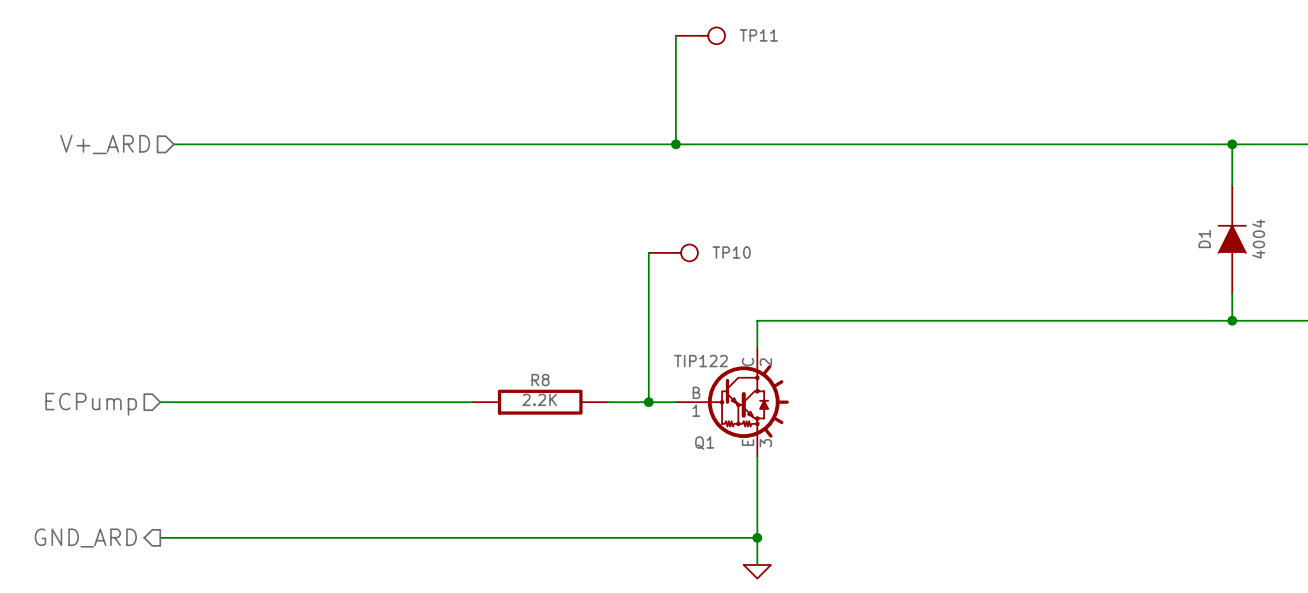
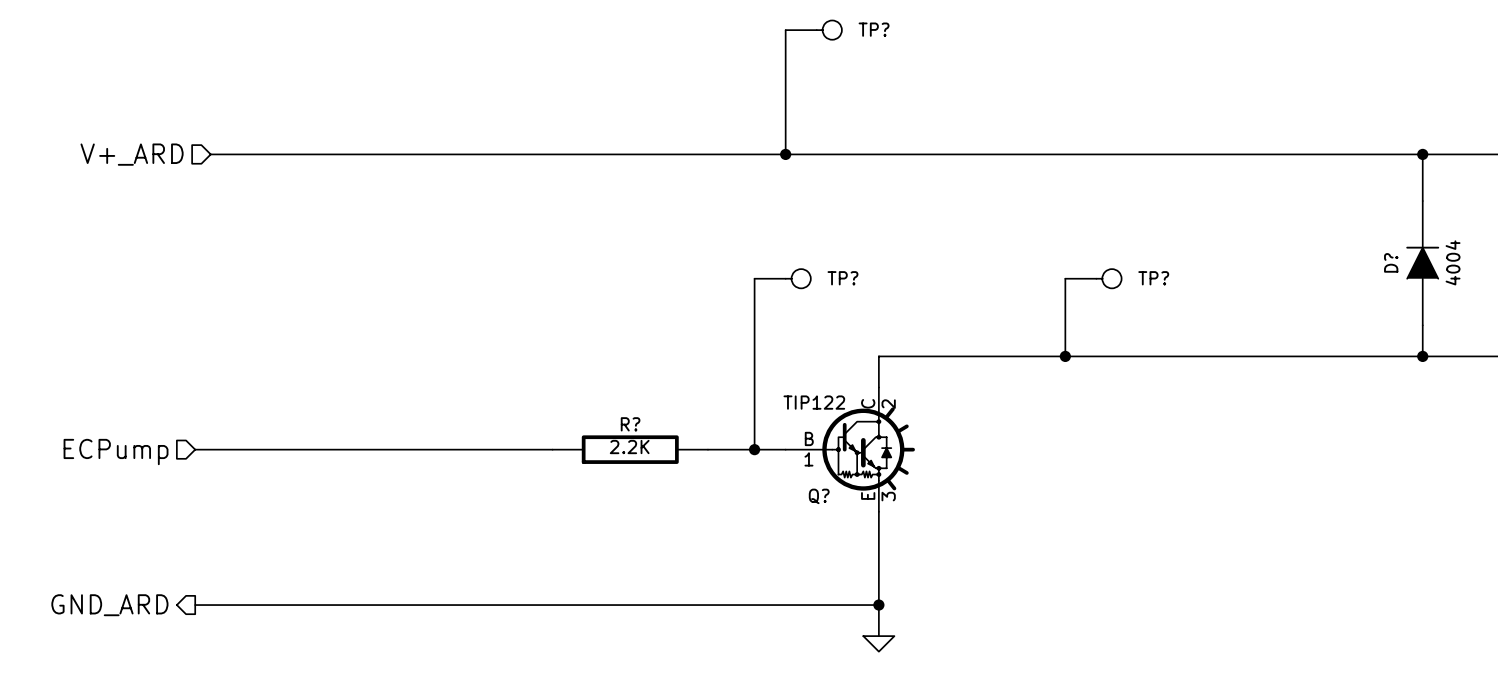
TP11 name: TP11 (758, 35) -> TP? (874, 29)
D1 name: D1 (1204, 239) -> D? (1391, 262)
TP10 name: TP10 (731, 252) -> TP? (842, 278)
wire: none -> (1065, 278) (1065, 356)
TP?: none -> (1093, 278)
junction: none -> (1065, 356)
R8 name: R8 (540, 380) -> R? (630, 424)
Q1 name: Q1 (704, 442) -> Q? (819, 496)

